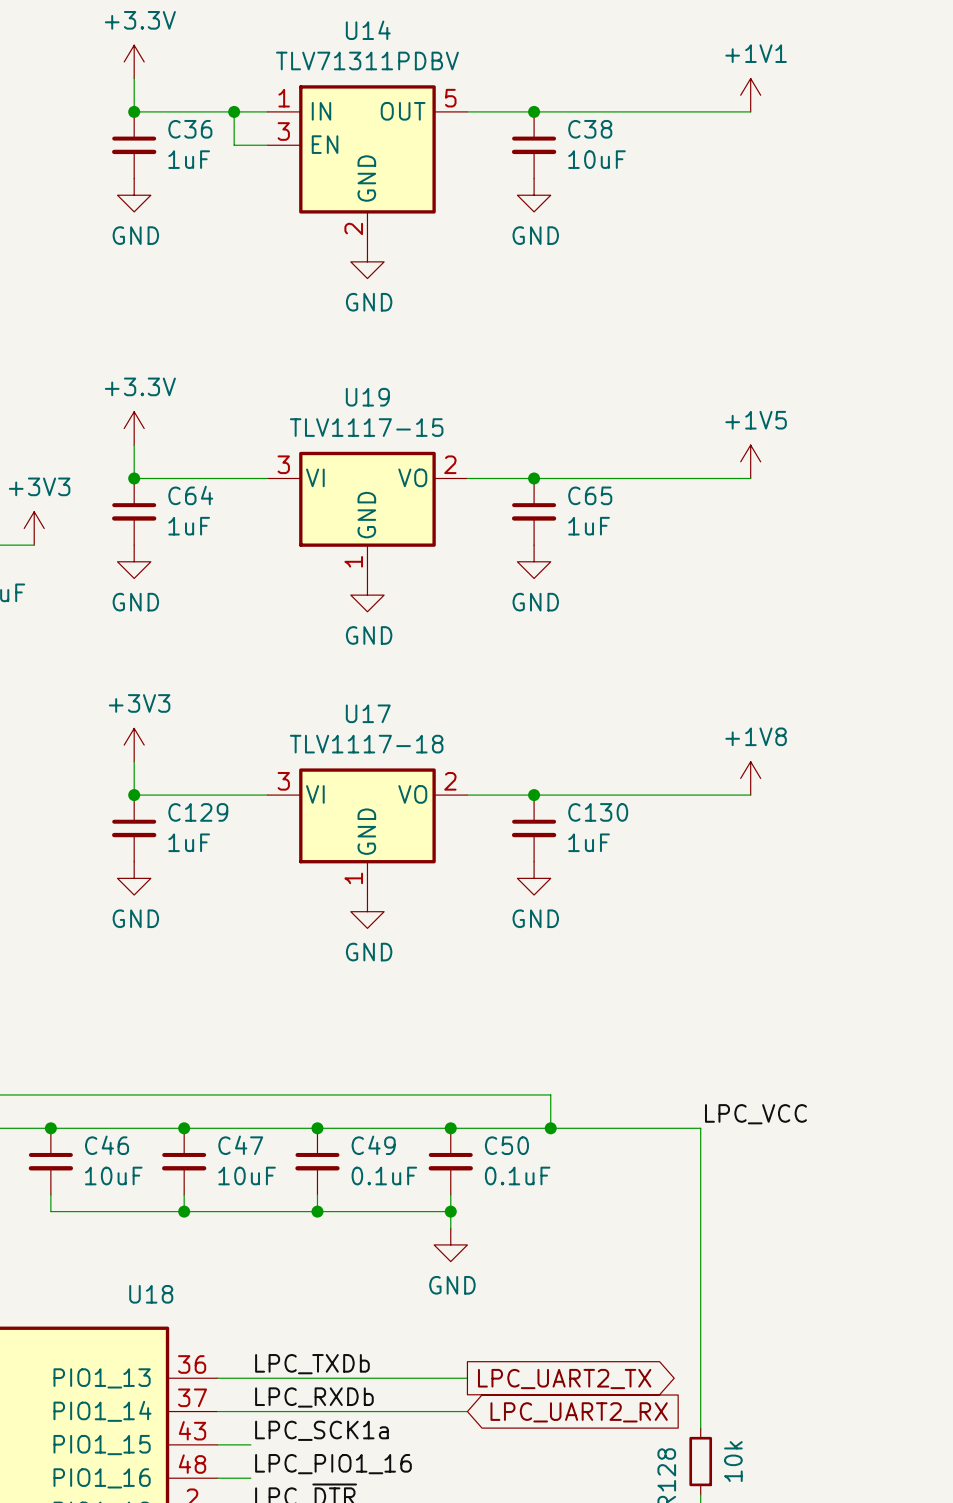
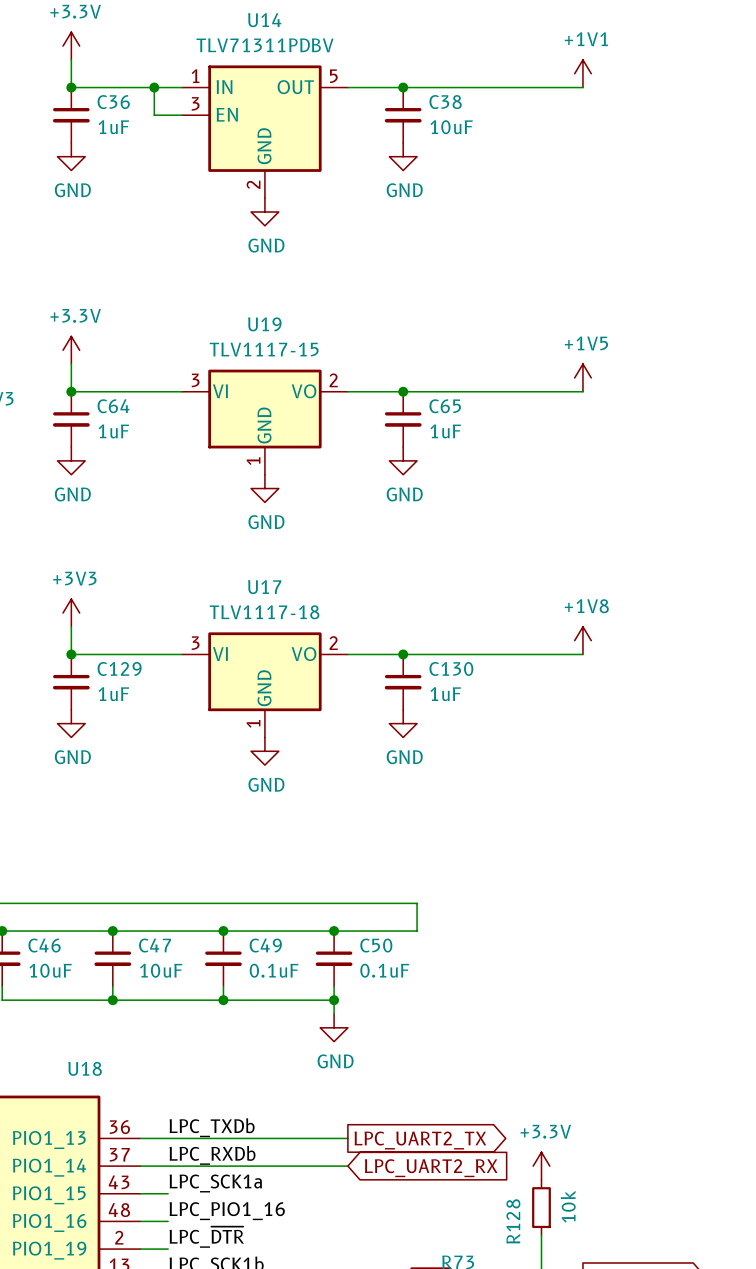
label: LPC_VCC (755, 1114) -> none
wire: (550, 1128) (700, 1128) (700, 1428) -> none
junction: (550, 1128) -> none
power symbol: none -> +3.3V (541, 1166)

